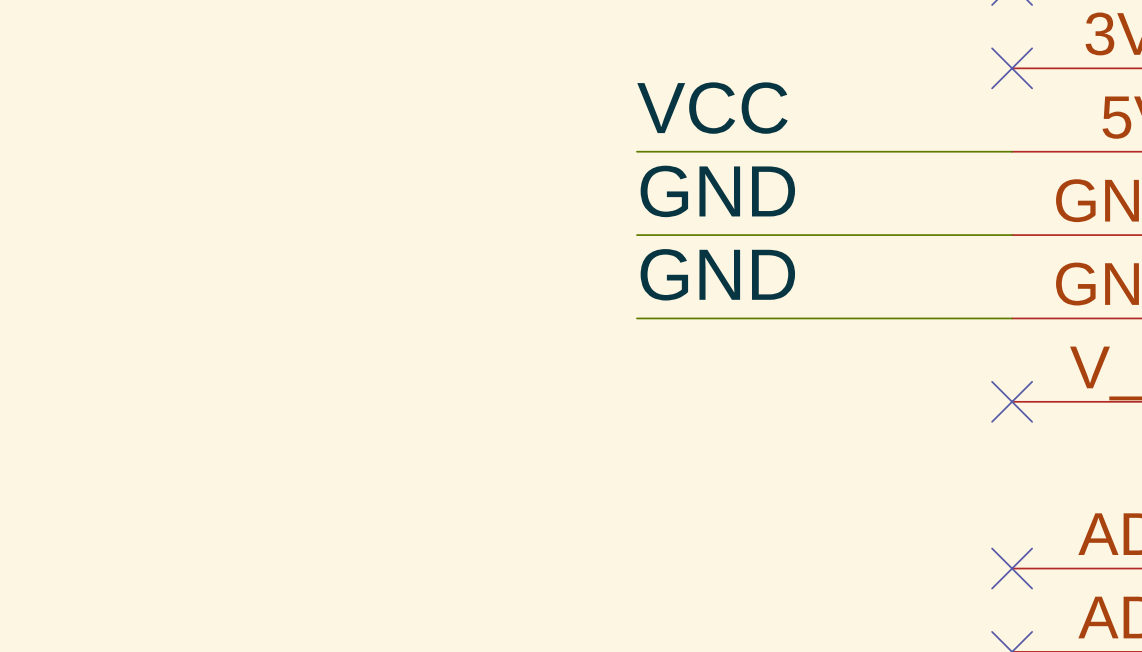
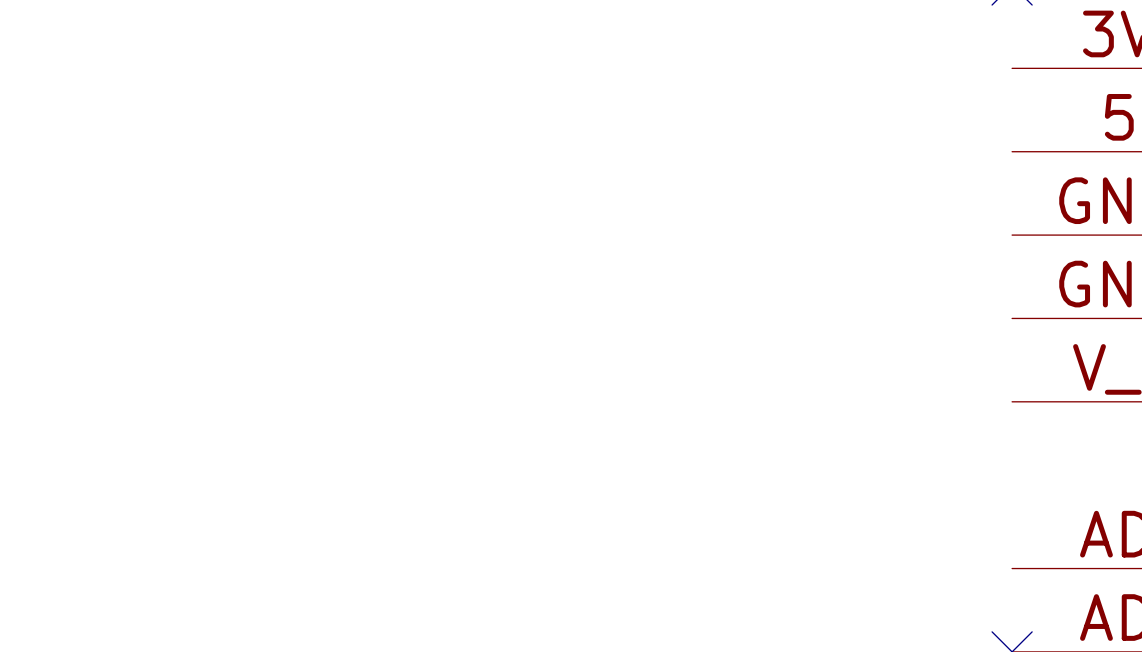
no-connect mark: (1012, 68) -> none
label: VCC (712, 108) -> none
wire: (636, 151) (1012, 151) -> none
label: GND (717, 191) -> none
wire: (636, 235) (1012, 235) -> none
label: GND (717, 274) -> none
wire: (636, 318) (1012, 318) -> none
no-connect mark: (1012, 401) -> none
no-connect mark: (1012, 568) -> none

